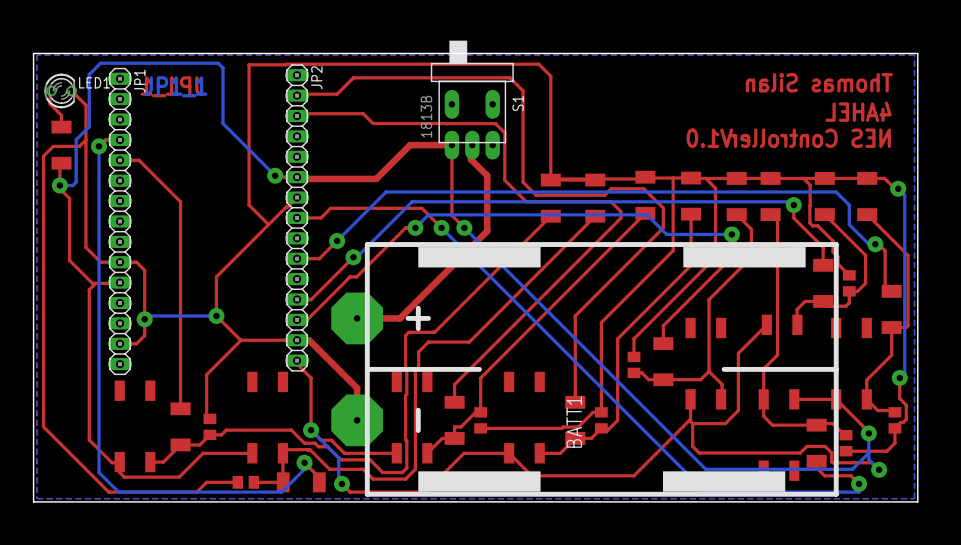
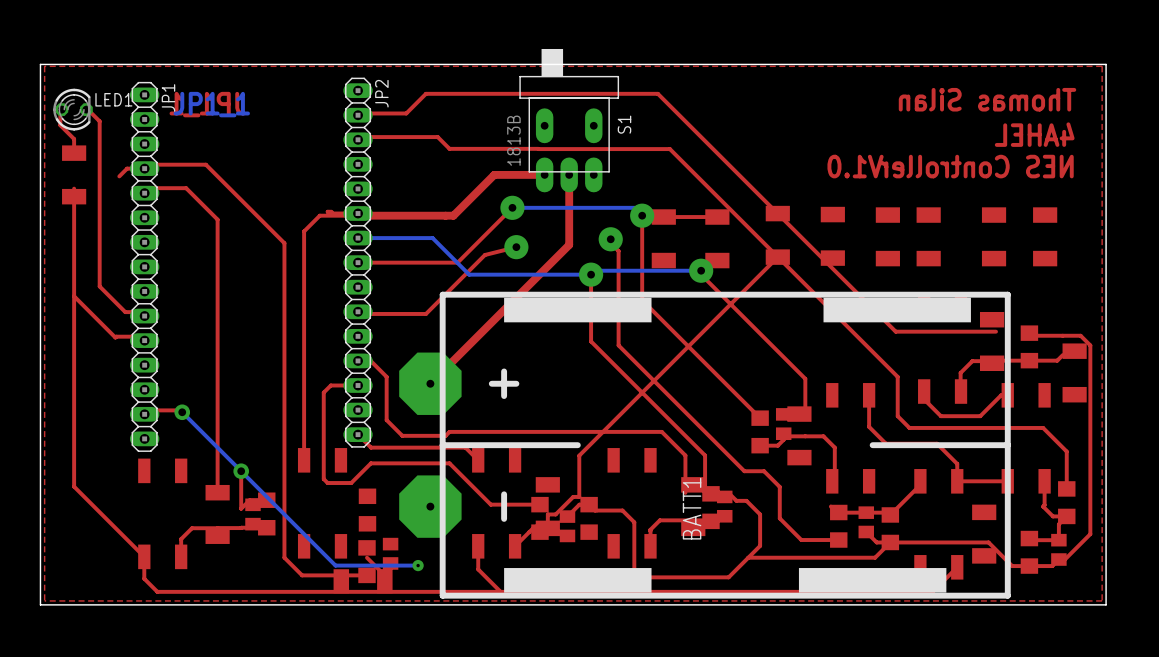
bottom zone outline: (914, 55) (37, 55) (37, 498) (914, 498) (914, 55) -> none
top track: (510, 77) (523, 90) (523, 182) (536, 195) (604, 195) (611, 188) (643, 188) (663, 207) (663, 227) (575, 315) (575, 402) -> (614, 93) (657, 93) (895, 331) (996, 331)
top track: (71, 90) (85, 105) (85, 247) (100, 262) (136, 262) (144, 270) (144, 335) (136, 343) (120, 343) -> (86, 109) (99, 121) (99, 286) (125, 312) (144, 312)
top track: (495, 123) (504, 132) (504, 180) (526, 201) (611, 201) (620, 211) (620, 218) (454, 384) (454, 402) -> (597, 149) (669, 149) (897, 376) (897, 416) (909, 427) (1043, 427) (1066, 451) (1066, 488)
top track: none -> (144, 164) (205, 164) (284, 243) (284, 557) (302, 575) (367, 575)
top track: (85, 139) (79, 146) (53, 146) (43, 156) (43, 426) (108, 492) (196, 492) (206, 482) (237, 482) -> none
top track: (451, 145) (451, 215) (464, 227) -> none
top track: (472, 145) (470, 159) (487, 175) (487, 231) (399, 318) (357, 318) -> (569, 174) (569, 244) (430, 383)
bottom track: (99, 146) (99, 472) (118, 492) (281, 492) (304, 469) (304, 462) -> none
via: (99, 146) -> none
top track: none -> (74, 188) (74, 486) (144, 556)
top track: (120, 160) (139, 160) (180, 201) -> (144, 189) (186, 188) (217, 219) (217, 243)
top track: (61, 163) (59, 164) (59, 188) (69, 198) (69, 260) (92, 283) (115, 283) (118, 280) -> none
bottom track: none -> (512, 207) (634, 207) (642, 215)
via: none -> (512, 207)
bottom track: (275, 175) (222, 123) (222, 68) (218, 63) (100, 63) (89, 74) (89, 126) (76, 139) (76, 182) (72, 185) (59, 185) -> none
via: (275, 175) -> none
top track: none -> (360, 215) (319, 215) (304, 231) (304, 460)
top track: none -> (642, 215) (642, 300) (760, 418)
via: none -> (642, 215)
top track: (673, 178) (673, 250) (601, 322) (601, 412) (593, 412) (578, 427) (480, 428) -> none
top track: (705, 178) (715, 188) (715, 257) (633, 338) (633, 356) -> none
top track: (803, 178) (810, 184) (809, 223) (812, 225) (817, 225) (832, 240) (832, 251) (838, 256) (838, 264) (849, 275) -> none
via: (59, 185) -> none
top track: (898, 188) (894, 188) (884, 178) (645, 177) (643, 178) (550, 180) (550, 76) (538, 64) (249, 64) (249, 205) (268, 224) -> none
bottom track: (898, 188) (904, 195) (904, 372) (899, 377) -> none
via: (898, 188) -> none
top track: (297, 197) (216, 276) (216, 315) (240, 340) -> none
bottom track: none -> (358, 238) (432, 238) (469, 274) (591, 274) (595, 270) (701, 270)
top track: none -> (610, 239) (610, 243) (618, 251) (618, 345) (744, 471) (764, 471) (779, 486) (779, 518) (801, 540) (838, 540)
via: none -> (610, 239)
via: none -> (516, 247)
top track: (793, 205) (793, 218) (823, 247) (823, 265) -> none
bottom track: (793, 205) (793, 201) (412, 201) (356, 257) (353, 257) -> none
via: (793, 205) -> none
top track: (691, 214) (691, 265) (617, 338) (617, 420) (607, 430) (601, 428) (591, 438) (575, 438) (560, 453) (539, 453) -> (710, 521) (659, 520) (650, 530) (650, 546)
top track: (736, 214) (751, 229) (751, 257) (709, 299) (709, 371) -> none
top track: (770, 214) (777, 215) (777, 355) (763, 368) (763, 399) -> none
top track: (824, 214) (865, 255) (865, 283) (857, 291) (849, 291) (849, 302) (846, 306) (827, 306) (823, 301) (805, 301) -> (1062, 355) (1057, 360) (996, 359) (994, 361) (972, 361) (970, 363)
top track: (867, 214) (907, 255) (907, 325) (906, 327) (891, 327) (891, 355) (866, 380) (866, 399) (877, 410) (893, 410) (894, 412) -> none
top track: (550, 216) (434, 332) (408, 332) (405, 335) (406, 468) (402, 472) (382, 472) (370, 459) (340, 459) (327, 446) (318, 446) (314, 443) (304, 443) (291, 430) (226, 430) (221, 434) (209, 434) (199, 444) (180, 444) (163, 462) (150, 462) -> (266, 527) (192, 528) (181, 539) (181, 556)
top track: (595, 216) (469, 342) (428, 342) (418, 351) (418, 368) (415, 371) (415, 469) (405, 479) (373, 479) (363, 469) (329, 469) (310, 449) (286, 449) (282, 453) (283, 482) (253, 482) -> none
top track: (321, 217) (330, 208) (421, 208) (441, 227) -> (386, 262) (457, 262) (512, 207)
top track: none -> (701, 270) (701, 274) (805, 378) (805, 408) (799, 414) (783, 414)
via: none -> (701, 270)
top track: (415, 227) (405, 227) (356, 276) (350, 276) (307, 319) (297, 319) -> (539, 504) (490, 504) (449, 463) (370, 463) (351, 483) (327, 483) (323, 479) (323, 392) (330, 385) (358, 385)
bottom track: (415, 227) (428, 214) (647, 214) (666, 234) (731, 234) -> none
via: (415, 227) -> none
bottom track: (441, 227) (705, 492) (859, 492) (859, 483) -> none
via: (441, 227) -> none
bottom track: (464, 227) (705, 469) (852, 469) (868, 452) -> none
via: (464, 227) -> none
top track: none -> (591, 274) (591, 341) (705, 455) (705, 487) (710, 493) (729, 493) (736, 500) (746, 500) (760, 514) (760, 545) (728, 577) (642, 577) (634, 569) (634, 522) (622, 510) (595, 510) (589, 504) (579, 504) (567, 516)
via: none -> (591, 274)
top track: (731, 234) (735, 237) (735, 254) (663, 325) (663, 343) -> none
via: (731, 234) -> none
top track: (337, 240) (319, 258) (297, 258) -> (516, 247) (484, 255) (425, 313) (360, 313) (358, 311)
via: (337, 240) -> none
top track: (875, 244) (878, 244) (885, 250) (885, 284) (891, 291) -> none
bottom track: (875, 244) (868, 244) (849, 224) (849, 205) (836, 192) (386, 192) (333, 244) -> none
via: (875, 244) -> none
top track: none -> (74, 296) (115, 337) (144, 336)
top track: (353, 257) (311, 299) (297, 299) -> (685, 492) (685, 455) (661, 431) (449, 431) (445, 435) (402, 435) (386, 420) (386, 376) (370, 360) (358, 360)
via: (353, 257) -> none
part footprint: [842, 270, 856, 297] -> [1020, 325, 1039, 369]
top track: (95, 283) (89, 289) (89, 439) (112, 462) (119, 462) -> none
bottom track: (216, 315) (147, 315) (144, 319) -> none
via: (216, 315) -> none
via: (144, 319) -> none
top track: (766, 324) (738, 353) (738, 410) (725, 423) (692, 423) (692, 446) (699, 452) (800, 452) (806, 446) (825, 446) (831, 452) (831, 461) -> (866, 532) (876, 542) (988, 542) (1002, 556)
top track: none -> (924, 391) (924, 399) (940, 416) (980, 416) (1001, 395) (1007, 395)
top track: none -> (869, 395) (869, 426) (885, 443) (937, 443) (957, 463) (957, 481)
top track: none -> (144, 410) (180, 410) (182, 412)
bottom track: none -> (182, 412) (335, 565) (418, 565)
via: none -> (182, 412)
part footprint: [627, 351, 641, 379] -> [751, 410, 769, 454]
part: none -> (783, 424)
top track: (297, 360) (297, 363) (311, 377) (311, 430) (321, 440) (331, 440) (344, 453) (396, 453) -> (358, 434) (371, 447) (465, 447) (478, 460)
top track: (709, 371) (722, 384) (721, 399) -> none
top track: (709, 371) (700, 379) (648, 379) (642, 372) (633, 372) -> none
top track: (899, 377) (899, 398) (906, 405) (906, 419) (894, 428) (894, 443) (886, 451) (846, 451) -> none
via: (899, 377) -> none
top track: none -> (241, 471) (241, 508) (249, 500) (266, 500)
via: none -> (241, 471)
top track: (690, 399) (690, 419) (633, 475) (531, 475) (509, 453) (464, 453) (425, 492) (350, 492) (342, 483) -> (832, 481) (834, 478) (834, 447) (823, 436) (786, 436) (783, 433) (783, 439) (777, 445) (760, 445)
top track: (836, 399) (868, 433) -> none
top track: none -> (1044, 481) (1043, 506) (1053, 516) (1066, 516) (1058, 524) (1058, 540) (1031, 540) (1029, 538)
top track: (763, 402) (763, 416) (772, 425) (832, 423) (846, 435) -> (920, 484) (890, 514) (888, 512) (838, 512)
part: none -> (1066, 502)
top track: (209, 418) (206, 415) (206, 374) (241, 340) (309, 340) (357, 388) (357, 420) -> none
part position: (480, 420) -> (567, 526)
part: (894, 420) -> none
part: none -> (710, 507)
part: none -> (367, 510)
part: none -> (266, 513)
bottom track: (311, 430) (338, 457) (338, 480) (342, 483) -> none
via: (311, 430) -> none
part: none -> (539, 518)
part: none -> (589, 518)
part: none -> (866, 522)
bottom track: (868, 433) (868, 459) (879, 469) -> none
via: (868, 433) -> none
part: none -> (838, 526)
part: none -> (890, 528)
part: (846, 443) -> none
top track: none -> (890, 542) (875, 557) (748, 557)
top track: (252, 453) (203, 453) (179, 477) (124, 477) (119, 472) -> (957, 567) (932, 591) (157, 591) (144, 578) (144, 569)
top track: none -> (478, 546) (478, 569) (500, 591)
part: none -> (1058, 549)
part: none -> (1029, 552)
part: none -> (390, 553)
top track: (816, 461) (813, 464) (824, 475) (850, 475) (859, 483) (859, 479) -> none
via: (304, 462) -> none
top track: (832, 462) (872, 462) (879, 469) -> (1003, 557) (1012, 566) (1052, 566) (1058, 559) (1064, 559) (1090, 534) (1090, 345) (1080, 335) (1032, 335) (1029, 333)
part: none -> (367, 561)
via: none -> (418, 565)
via: (879, 469) -> none
part: (245, 482) -> none
via: (342, 483) -> none
via: (859, 483) -> none

